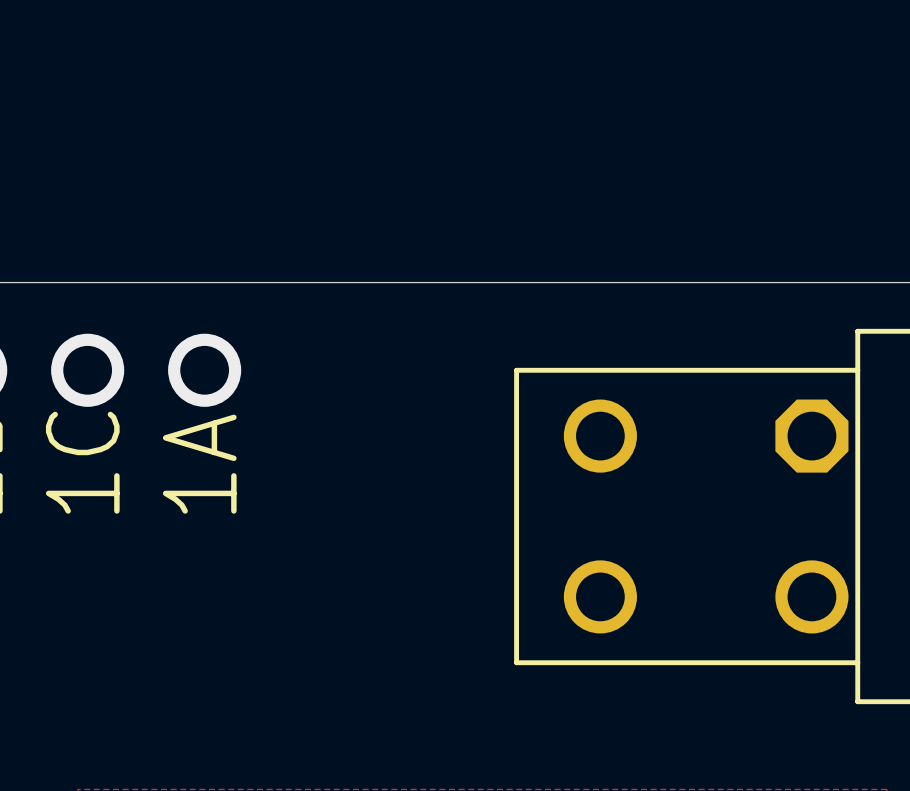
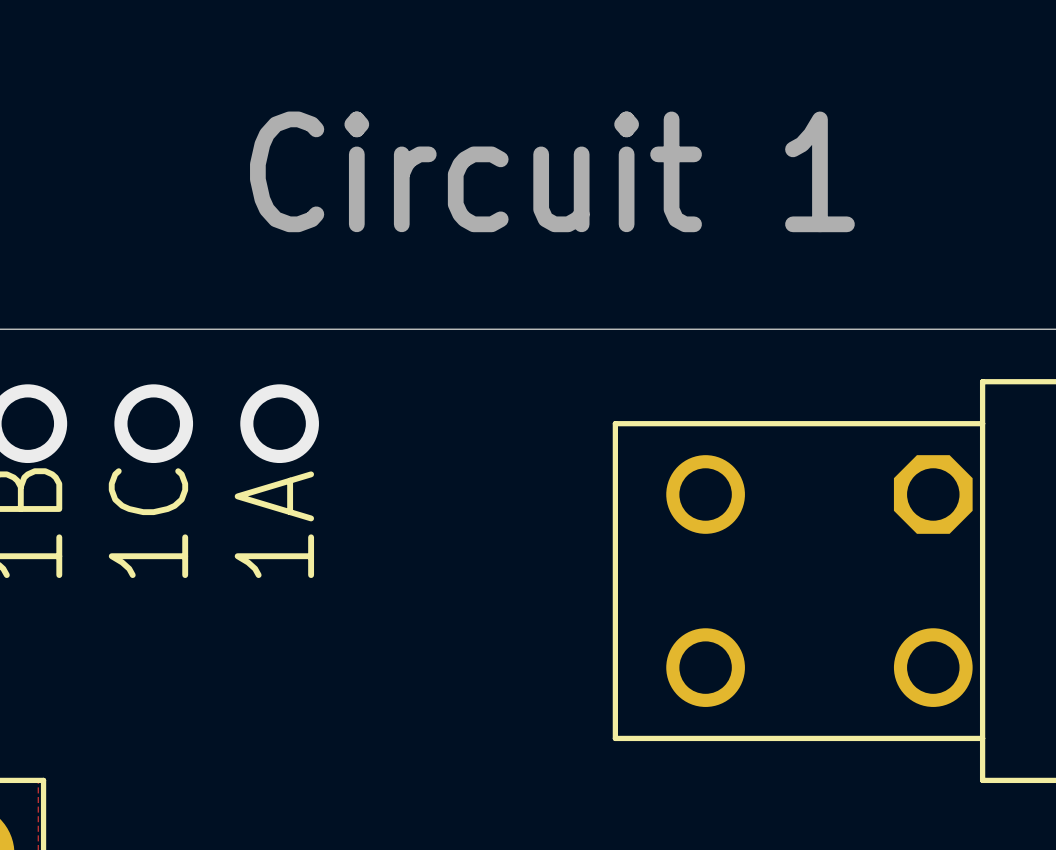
text: none -> Circuit 1 (552, 171)

